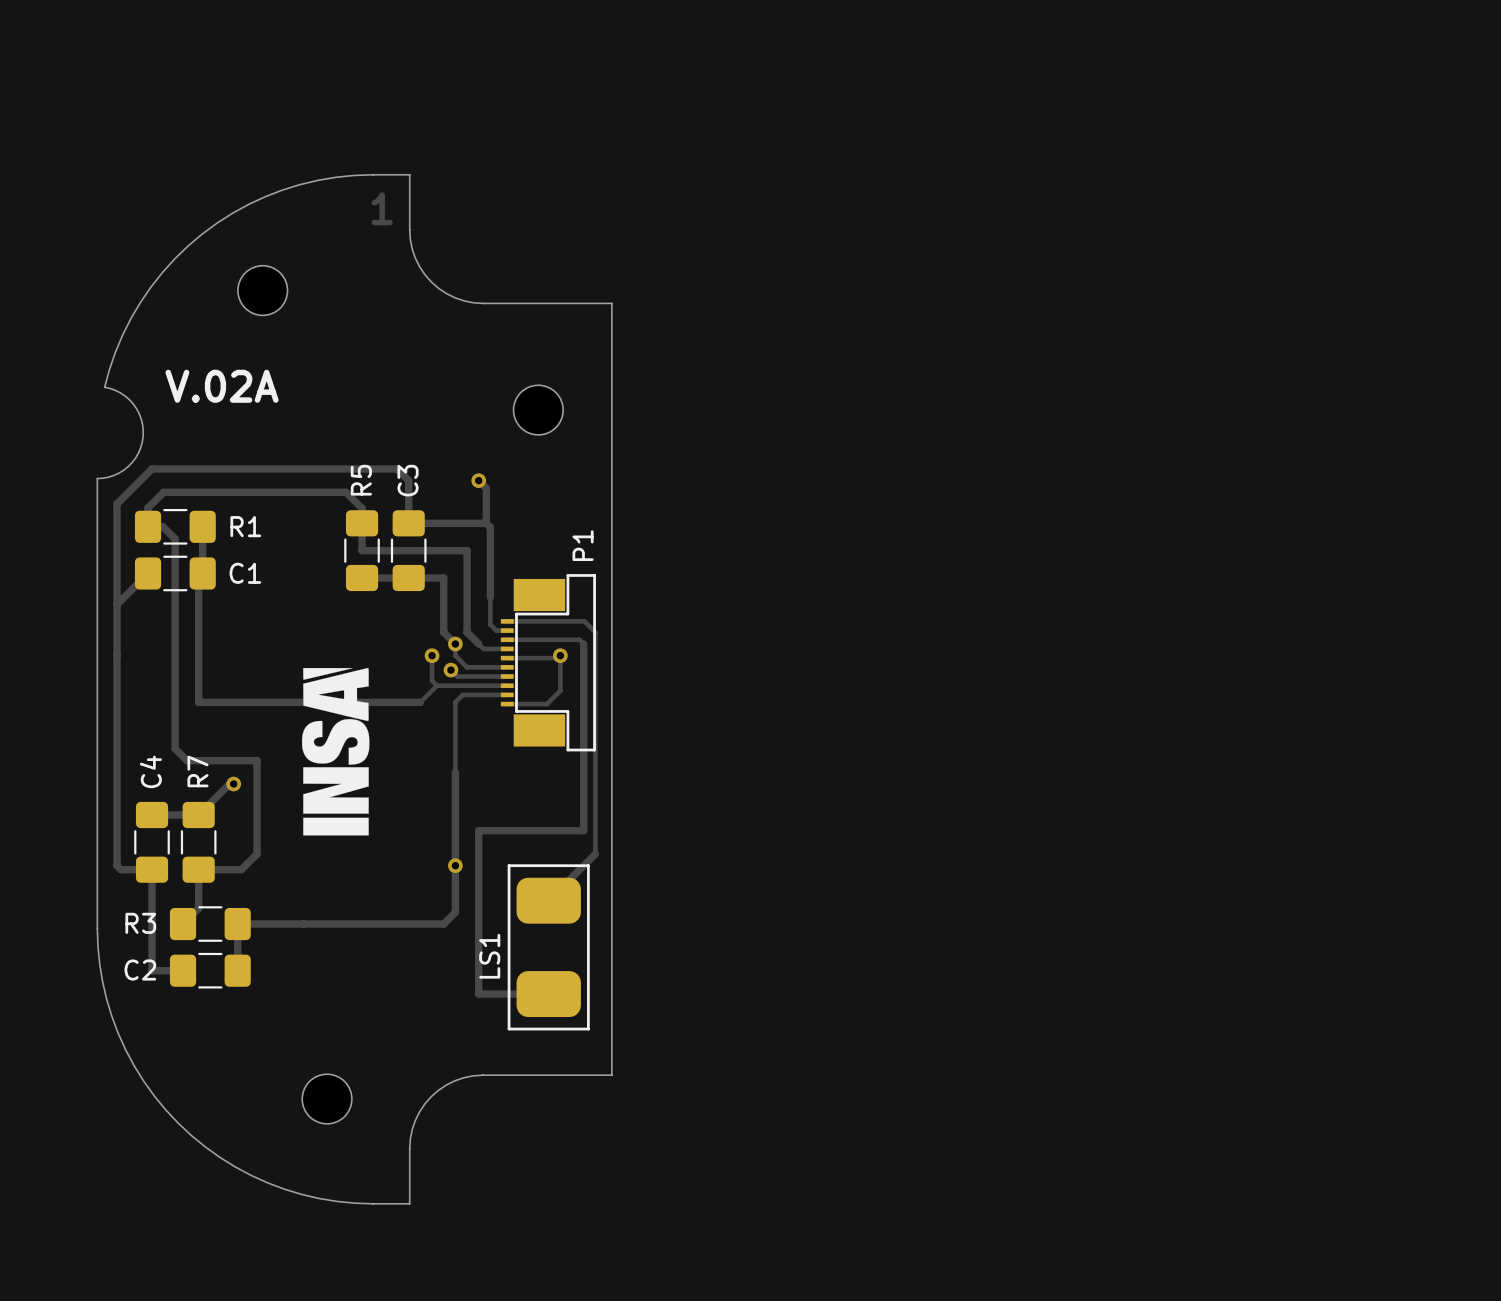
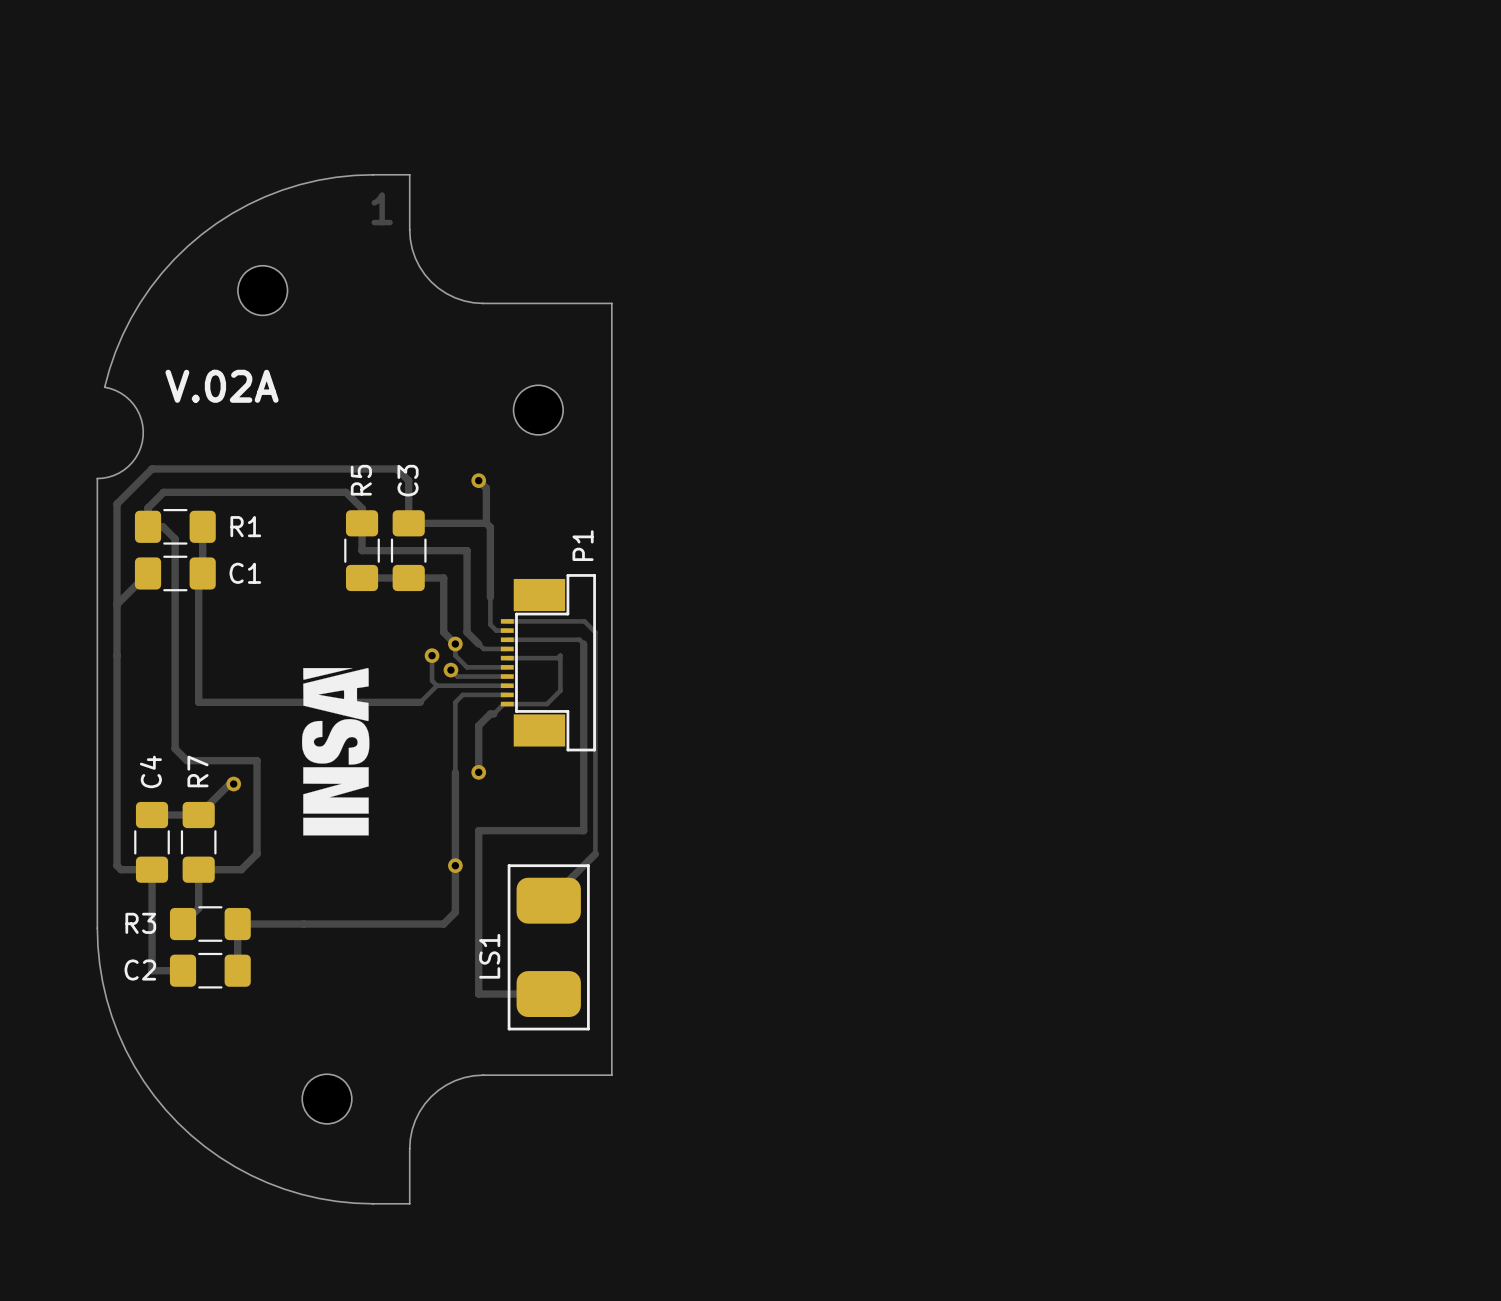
via: (560, 655) -> none
track: none -> (507, 704) (503, 704) (493, 714) (490, 714) (478, 725) (478, 772)
via: none -> (478, 772)

